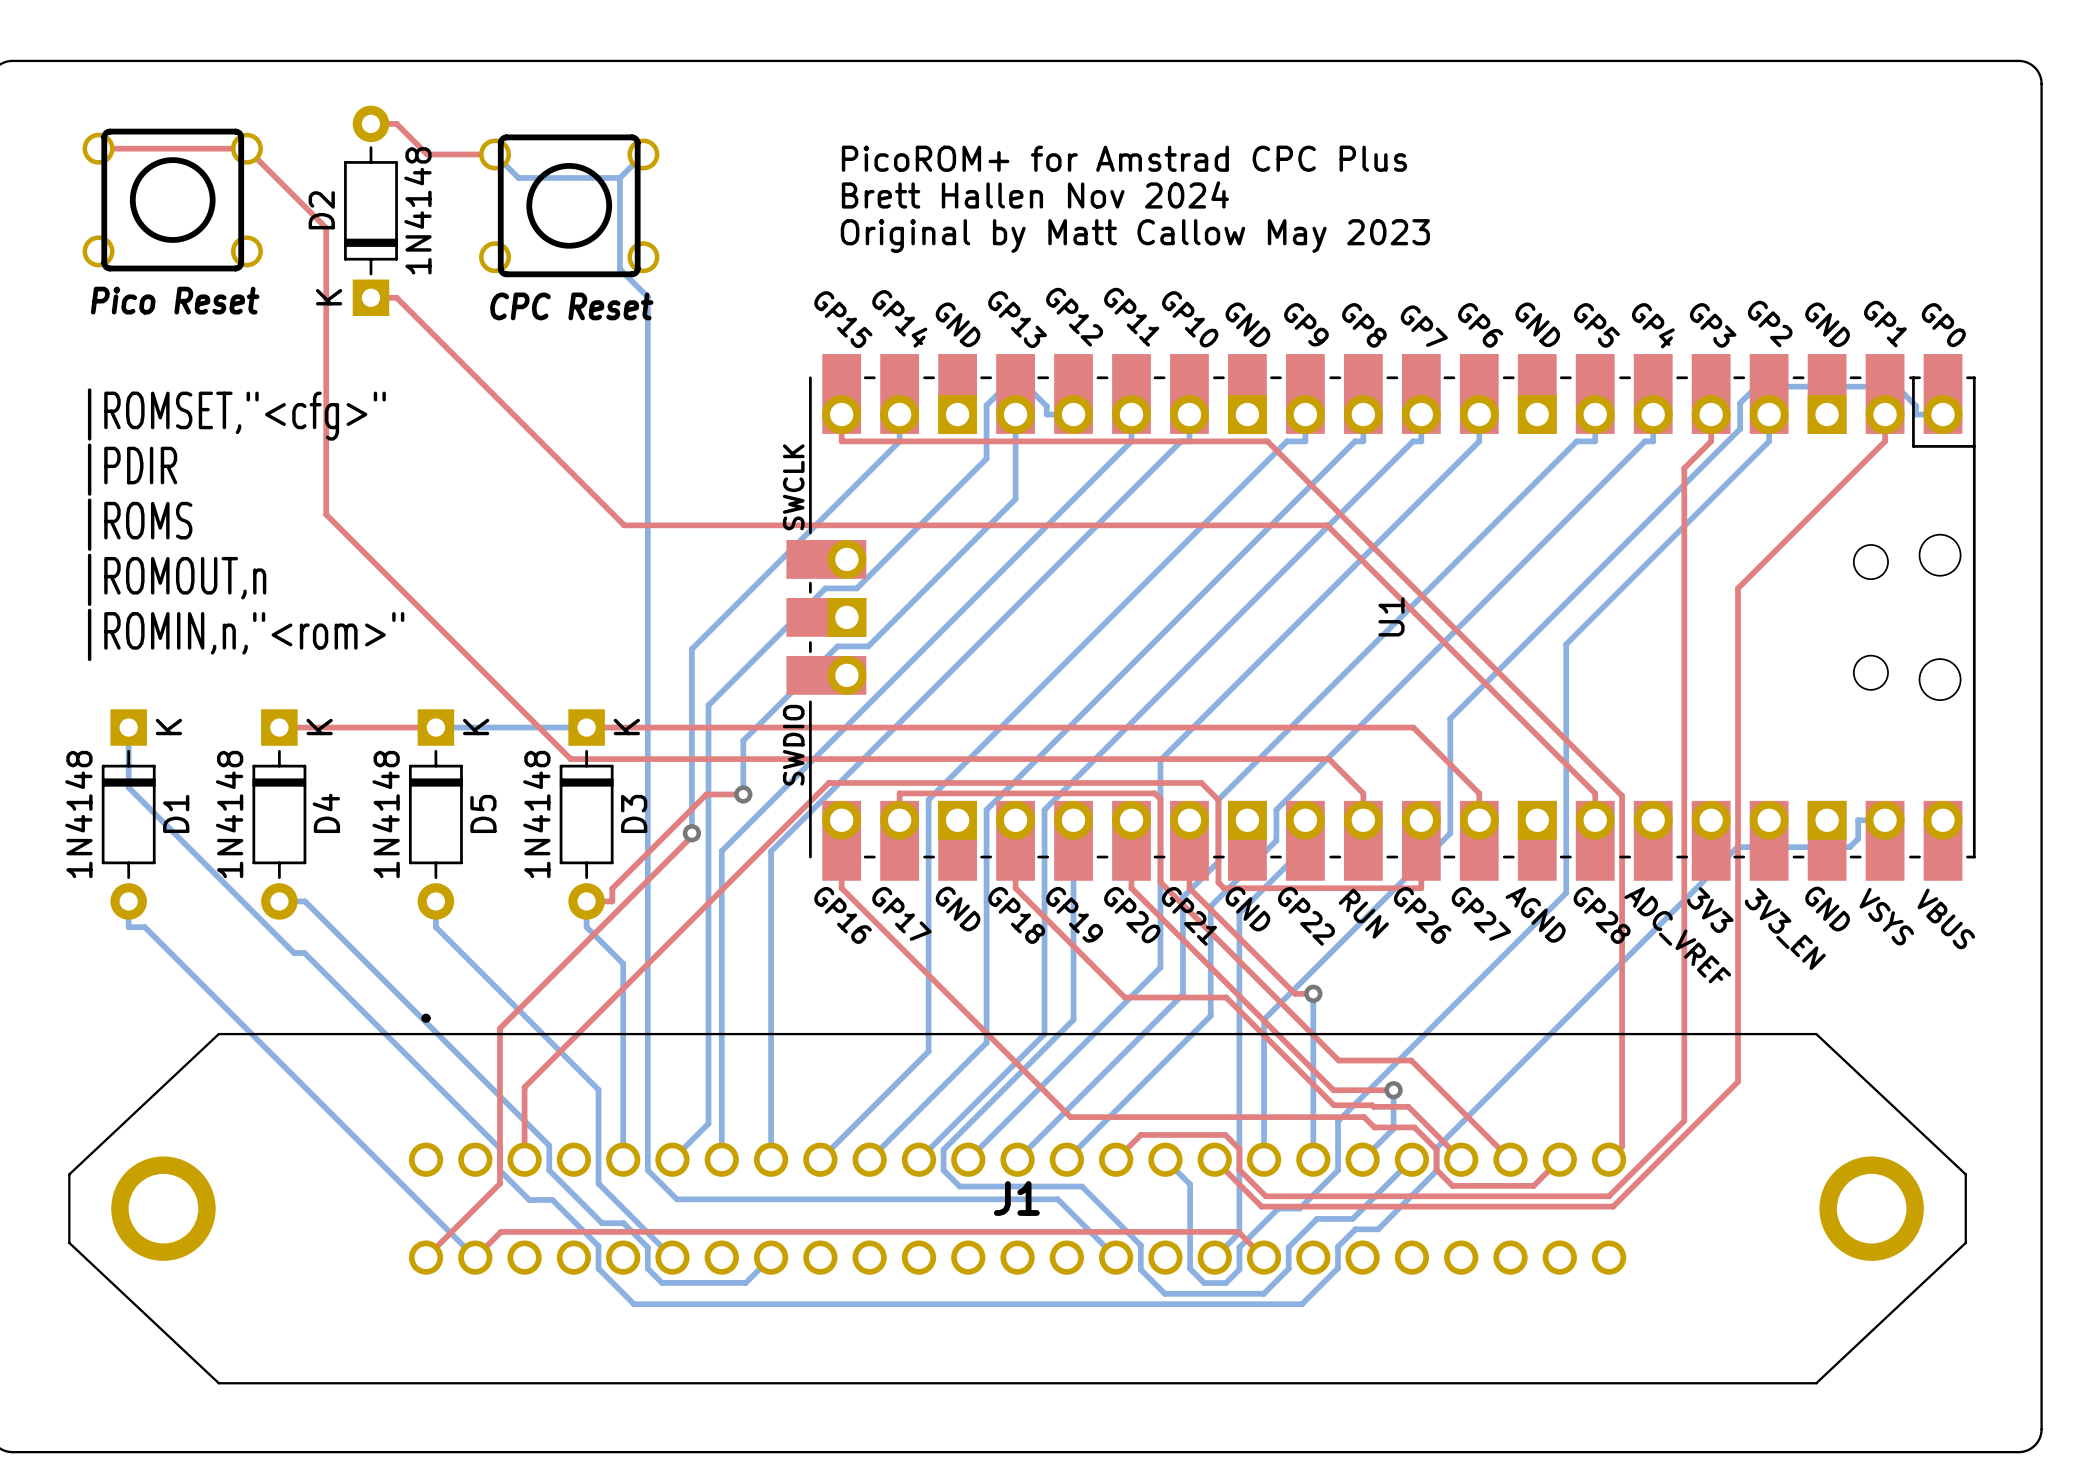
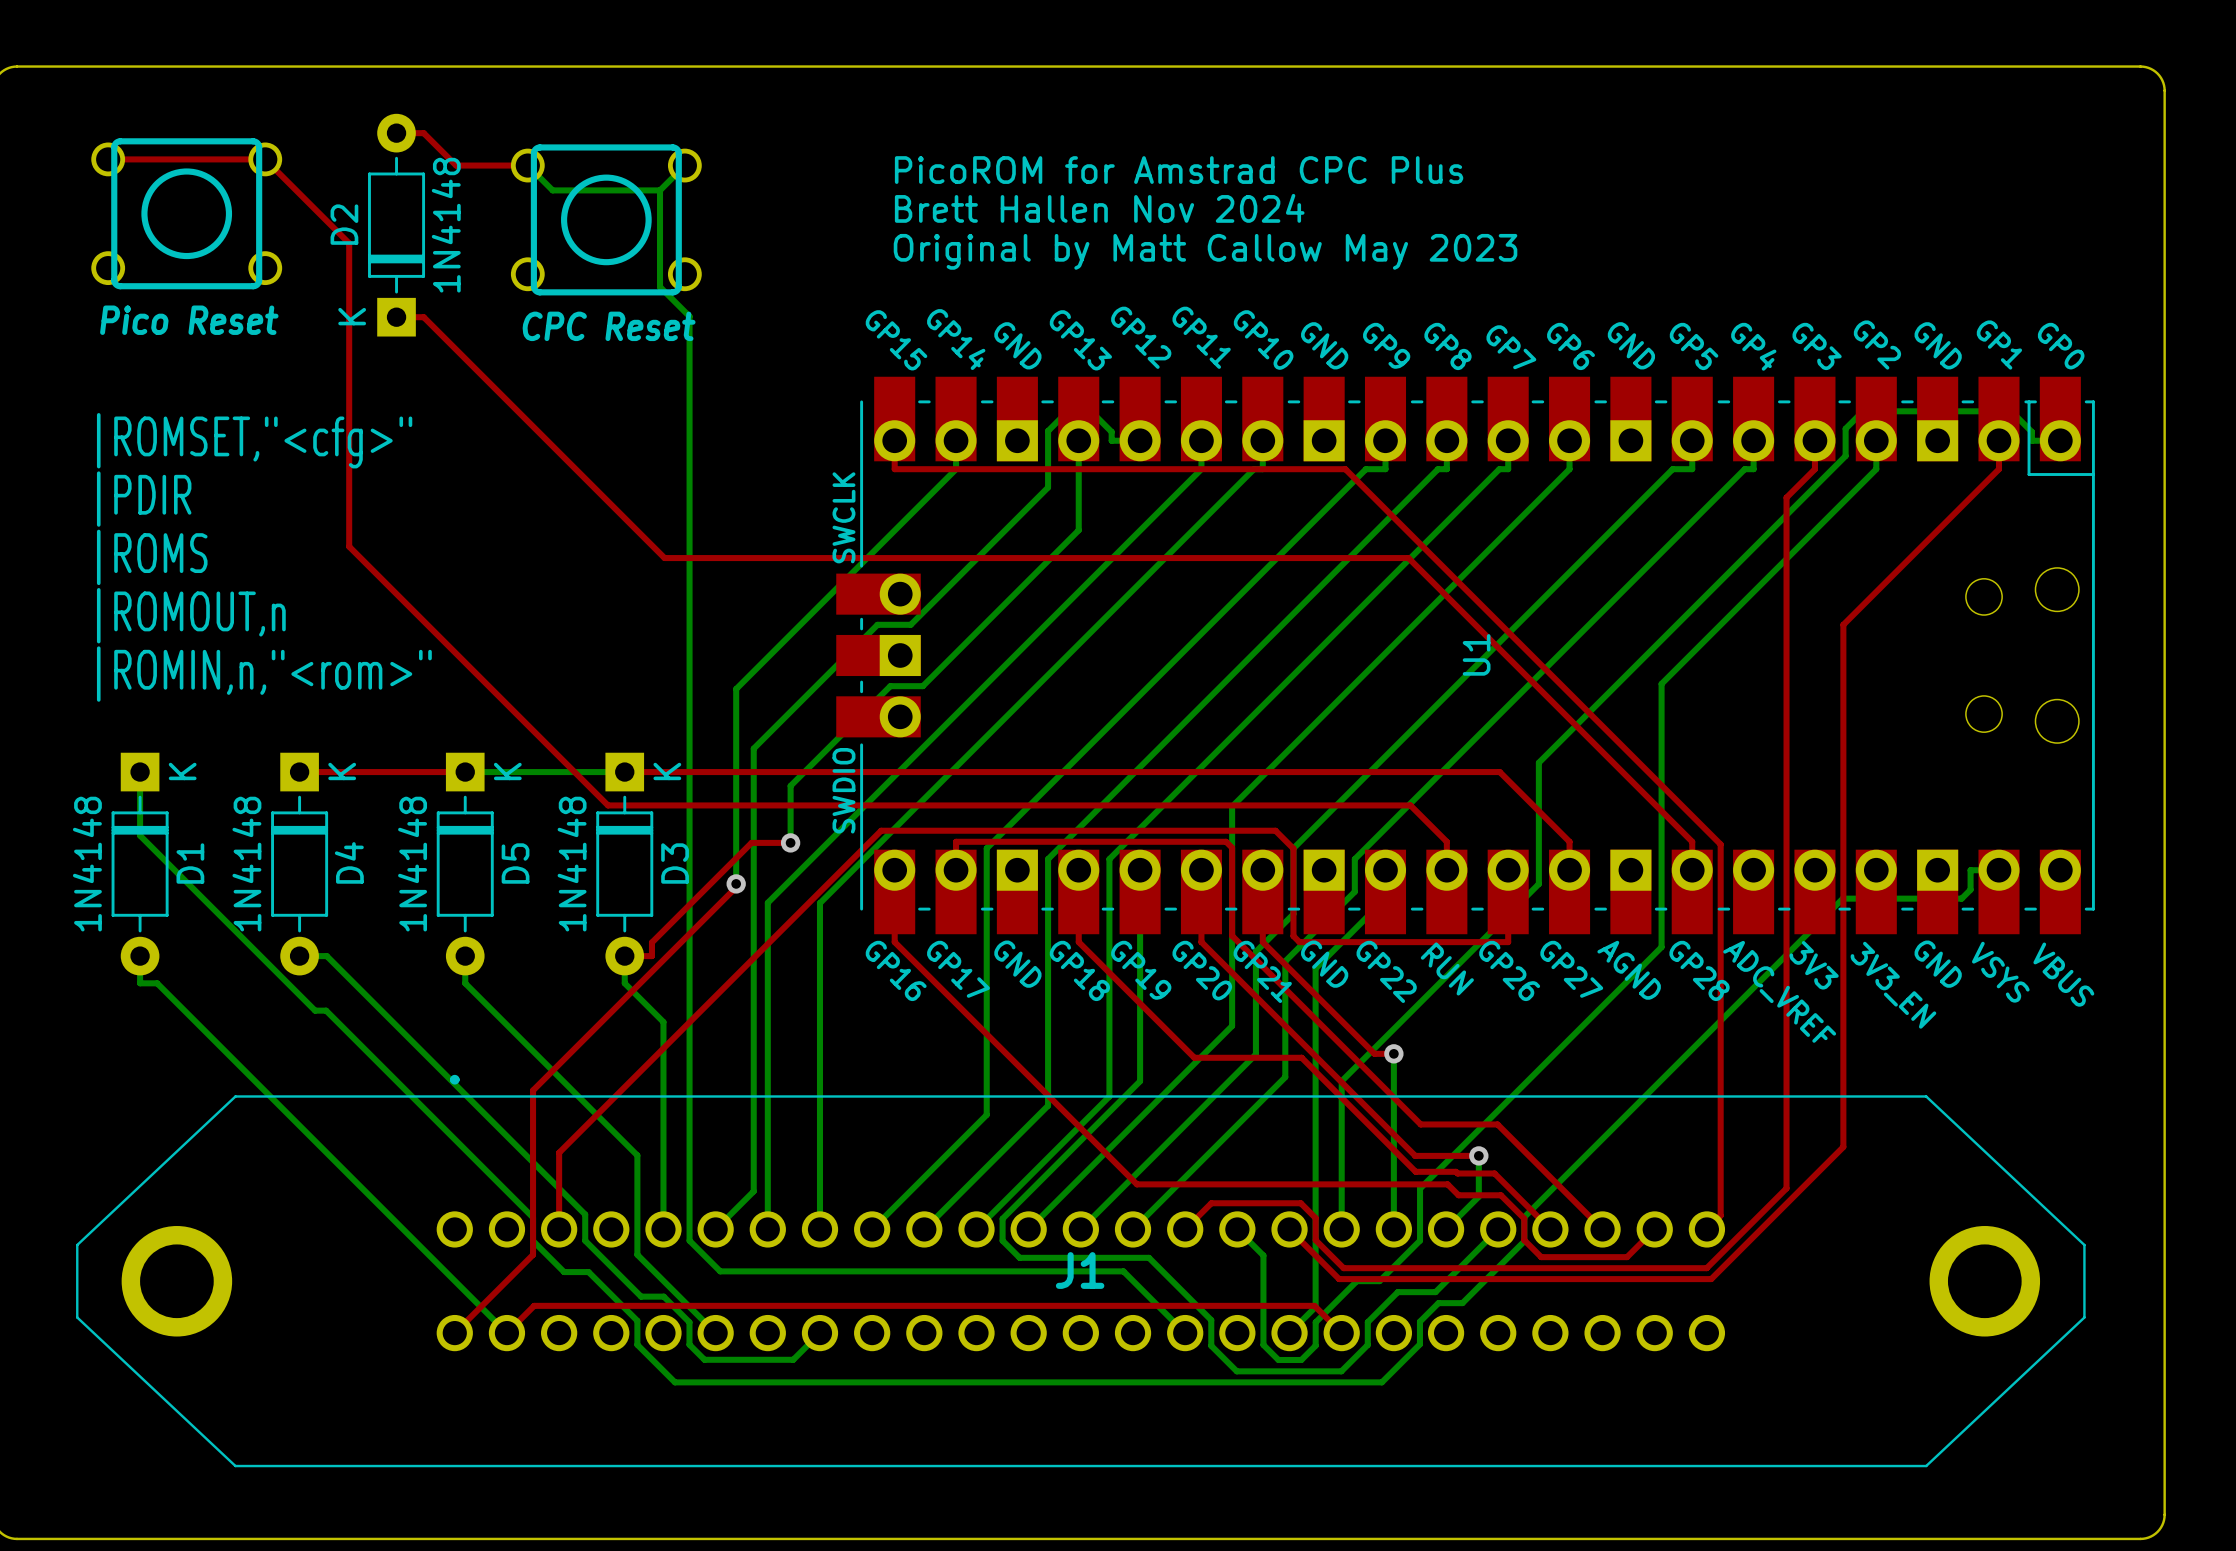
text: PicoROM+ for Amstrad CPC Plus (1124, 158) -> PicoROM for Amstrad CPC Plus (1179, 170)

